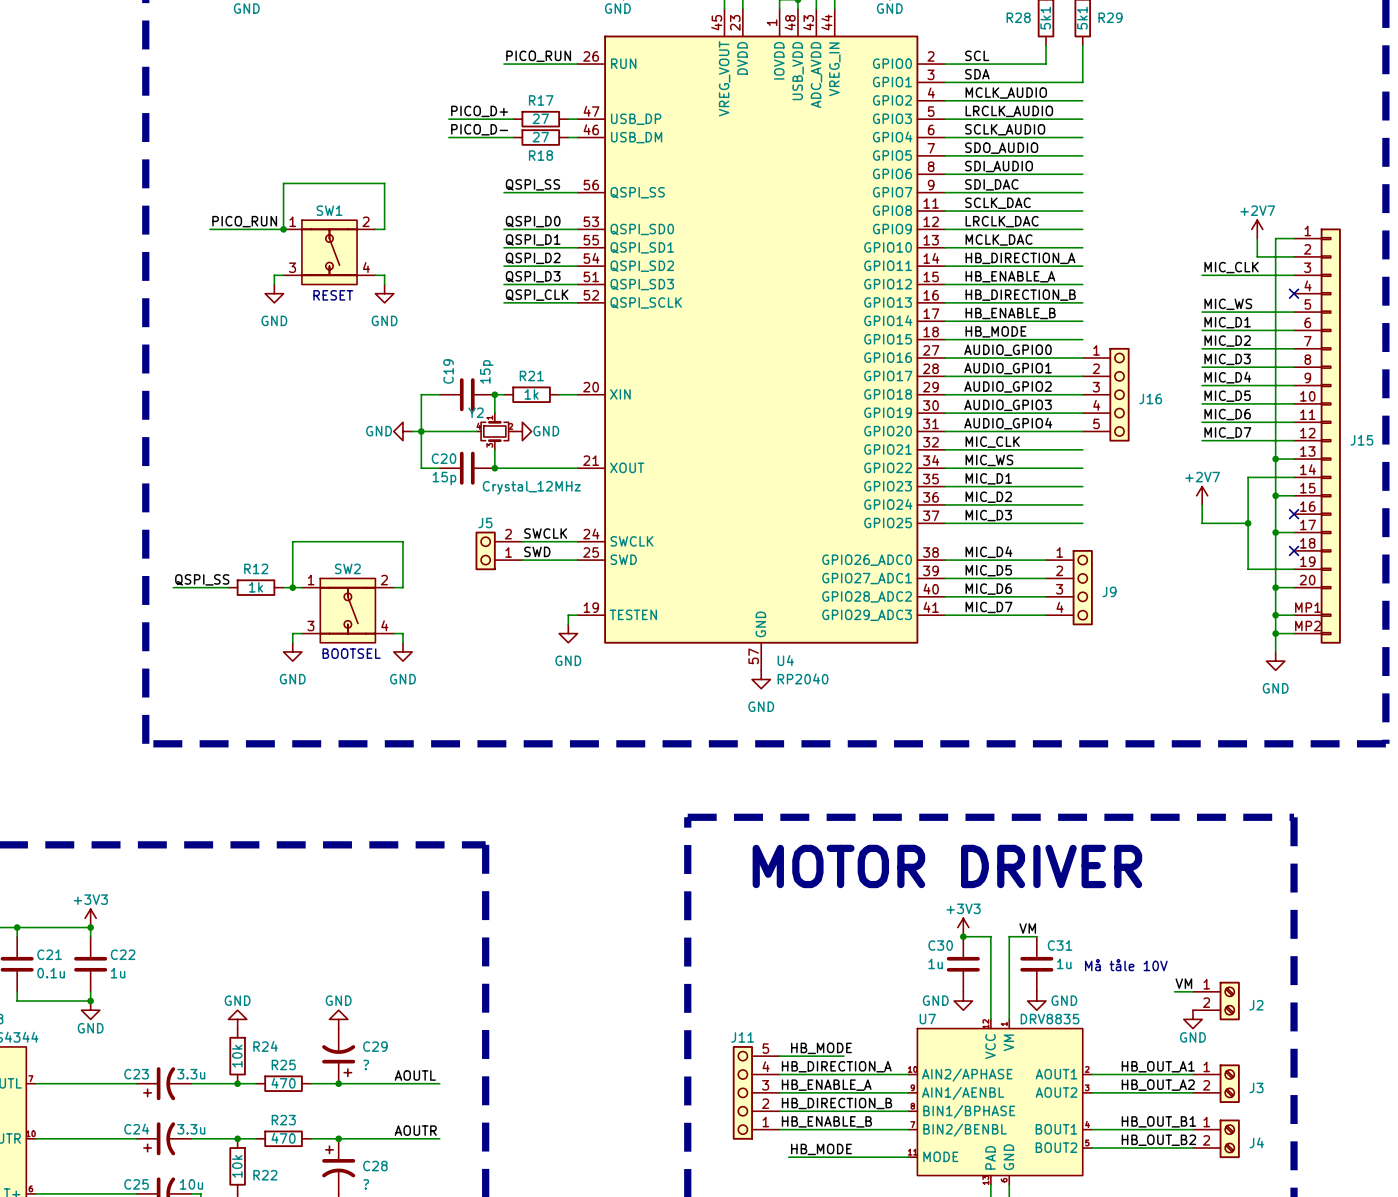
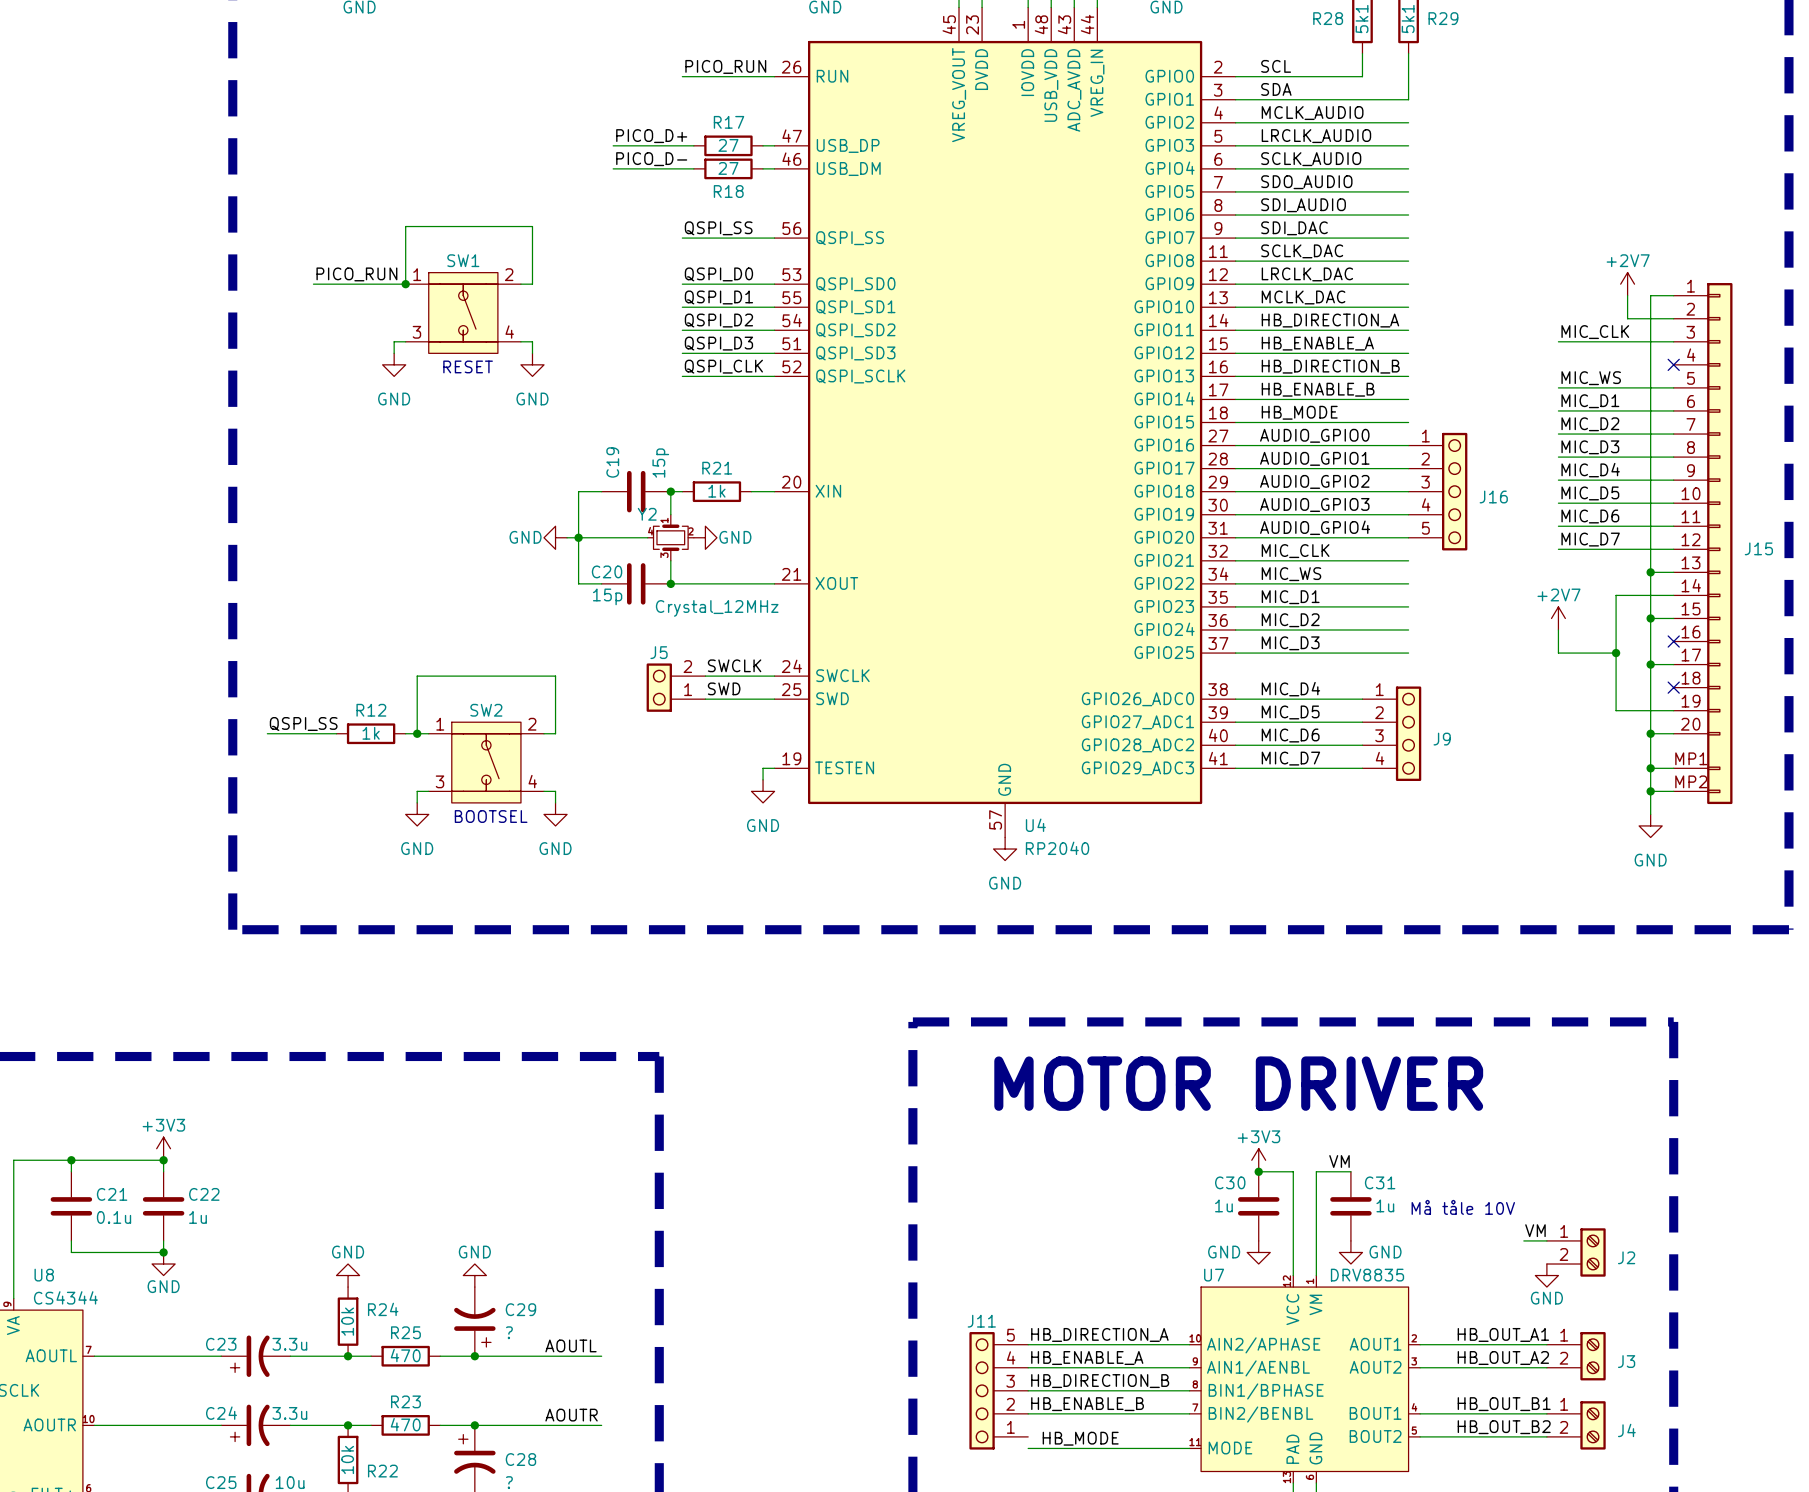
label: HB_MODE (821, 1048) -> none
wire: (779, 1056) (843, 1056) -> none
J11 position: (756, 1092) -> (998, 1390)
wire: none -> (1028, 1448) (1039, 1448)

